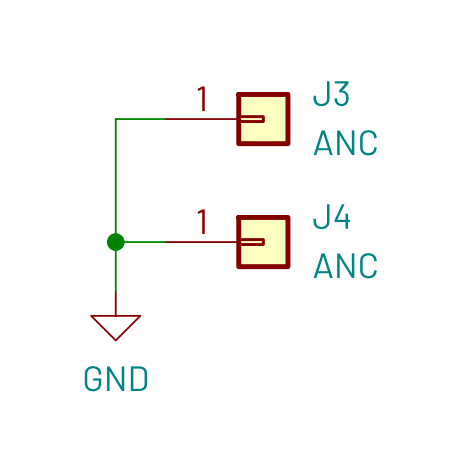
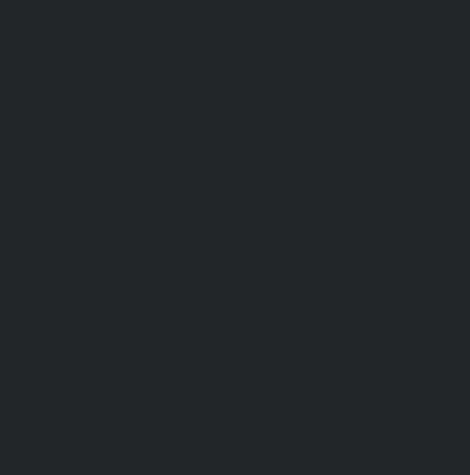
wire: (164, 119) (115, 119) (115, 291) -> none
J3: ANC (227, 119) -> none
wire: (115, 242) (164, 242) -> none
junction: (115, 242) -> none
J4: ANC (227, 242) -> none
power symbol: GND (115, 315) -> none

